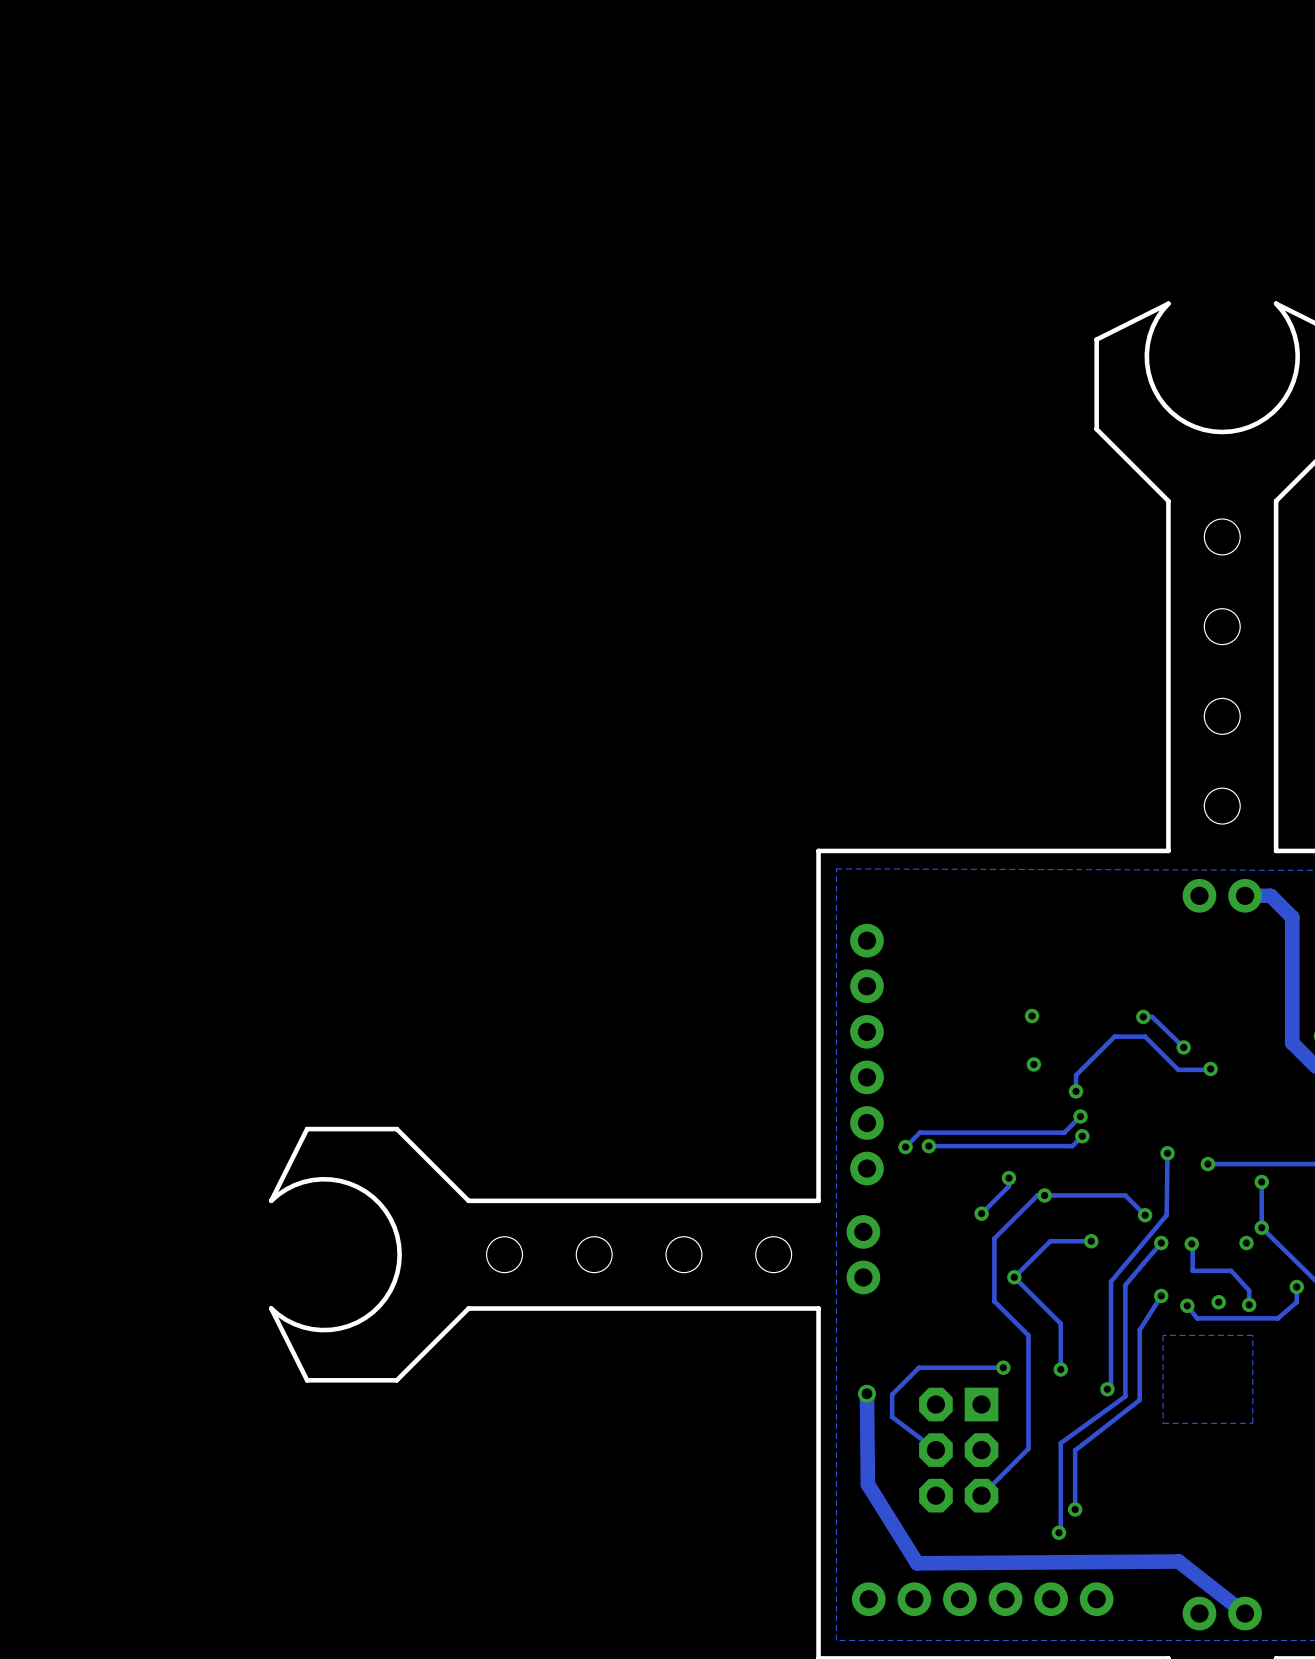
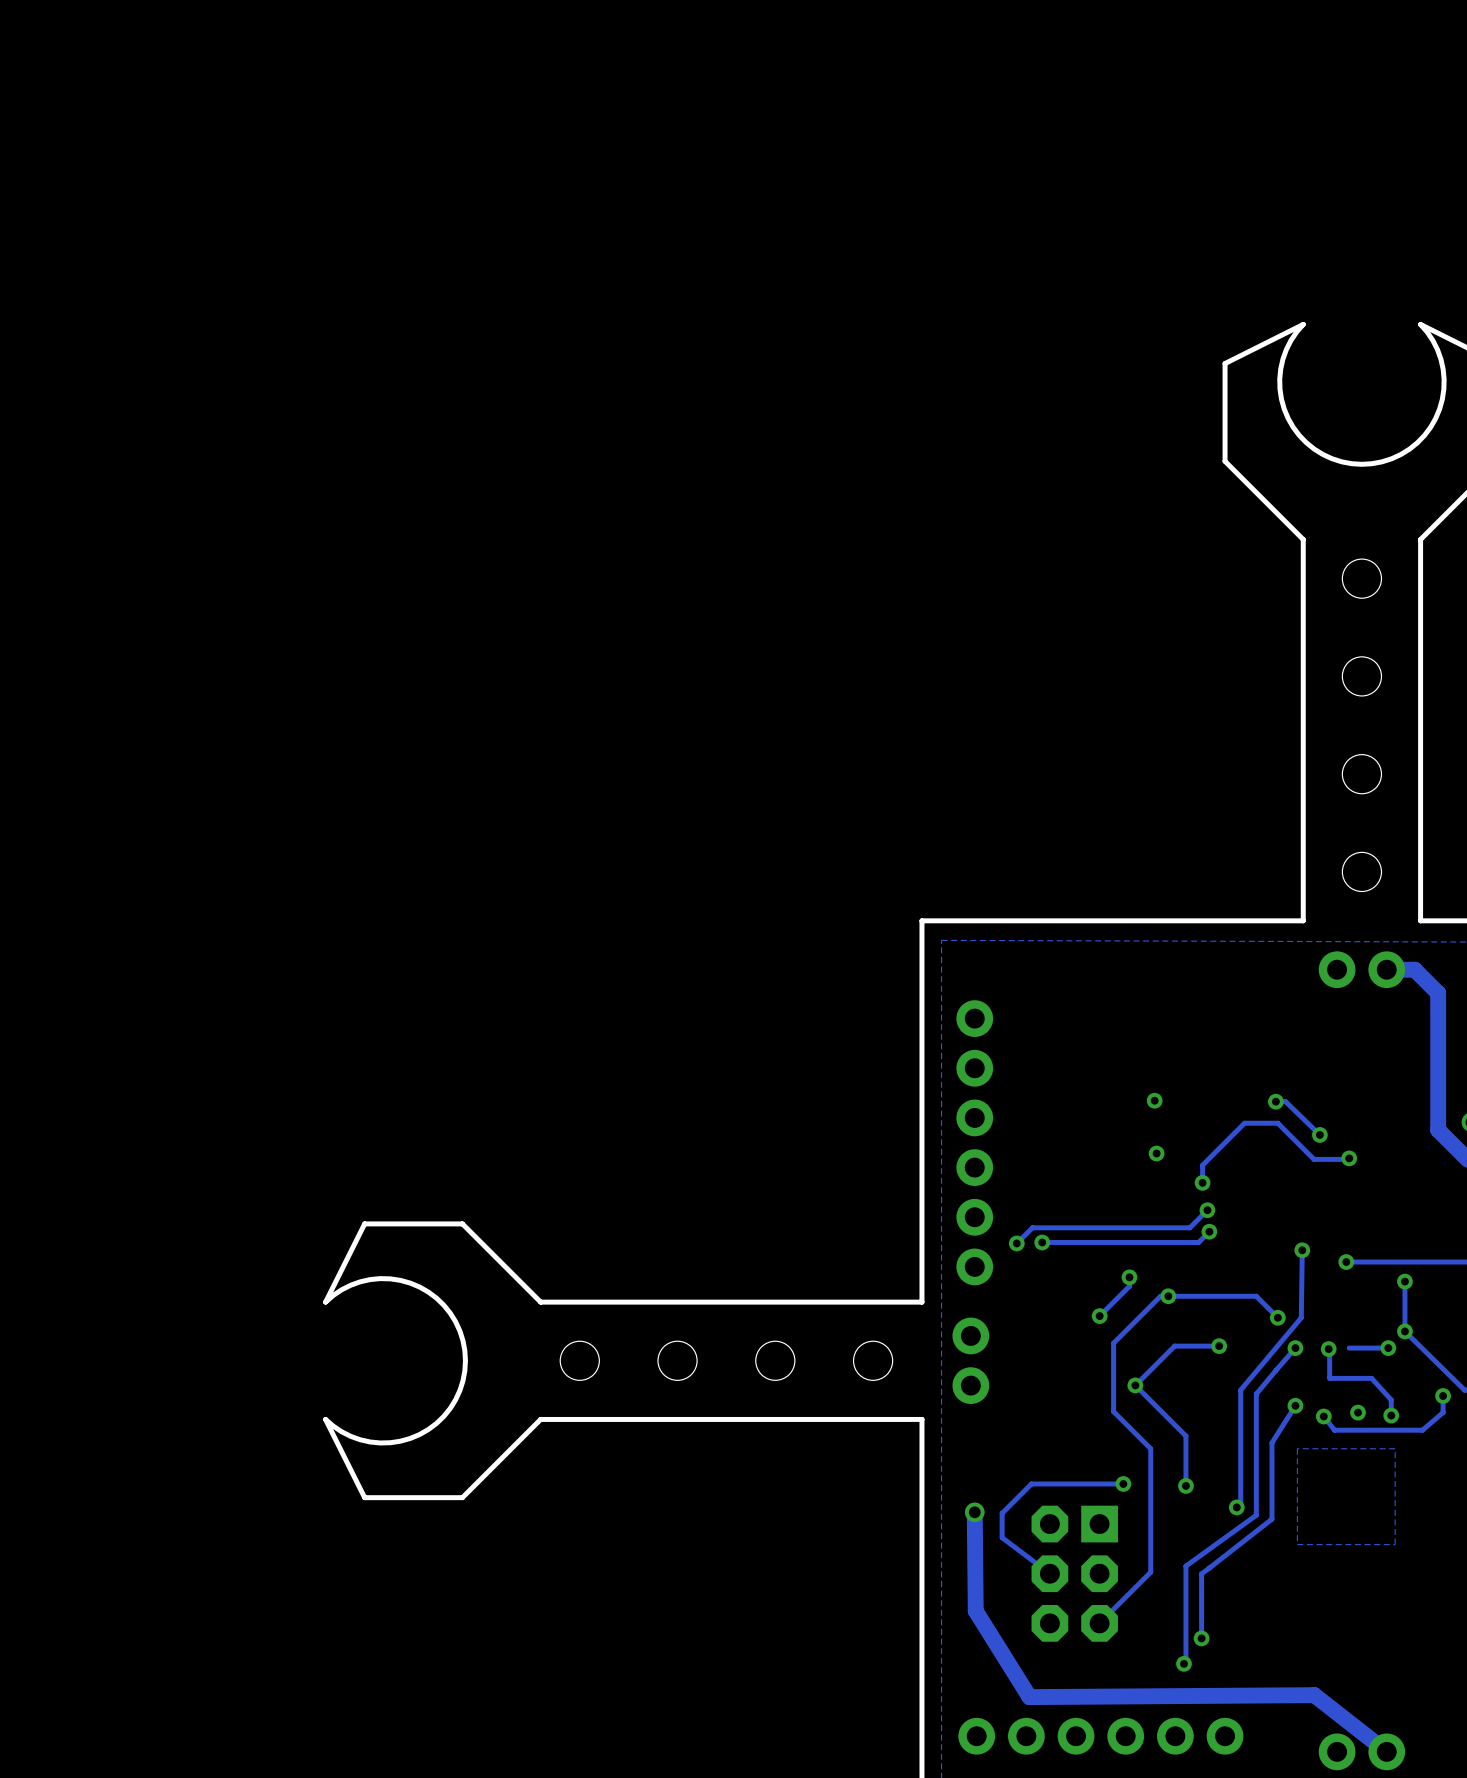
track: none -> (1388, 1348) (1349, 1348)

